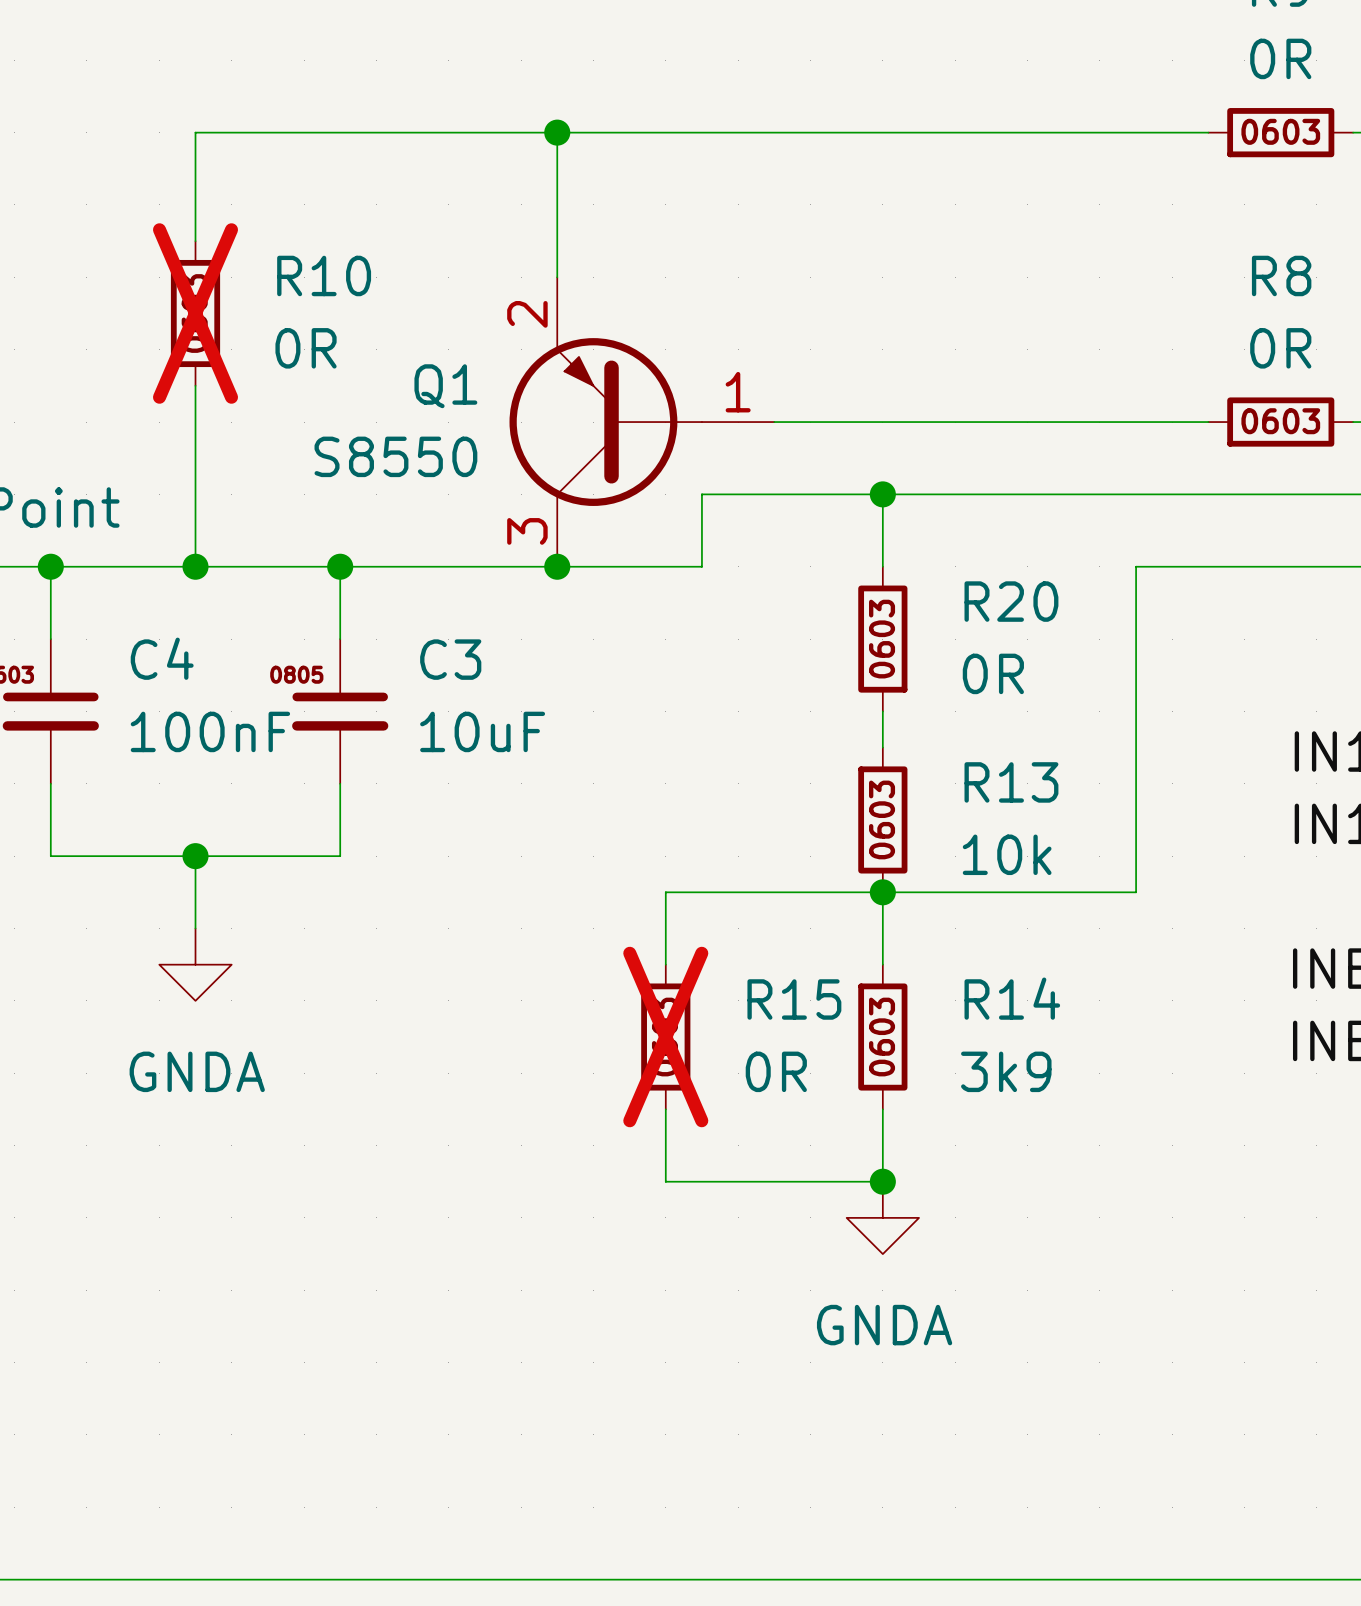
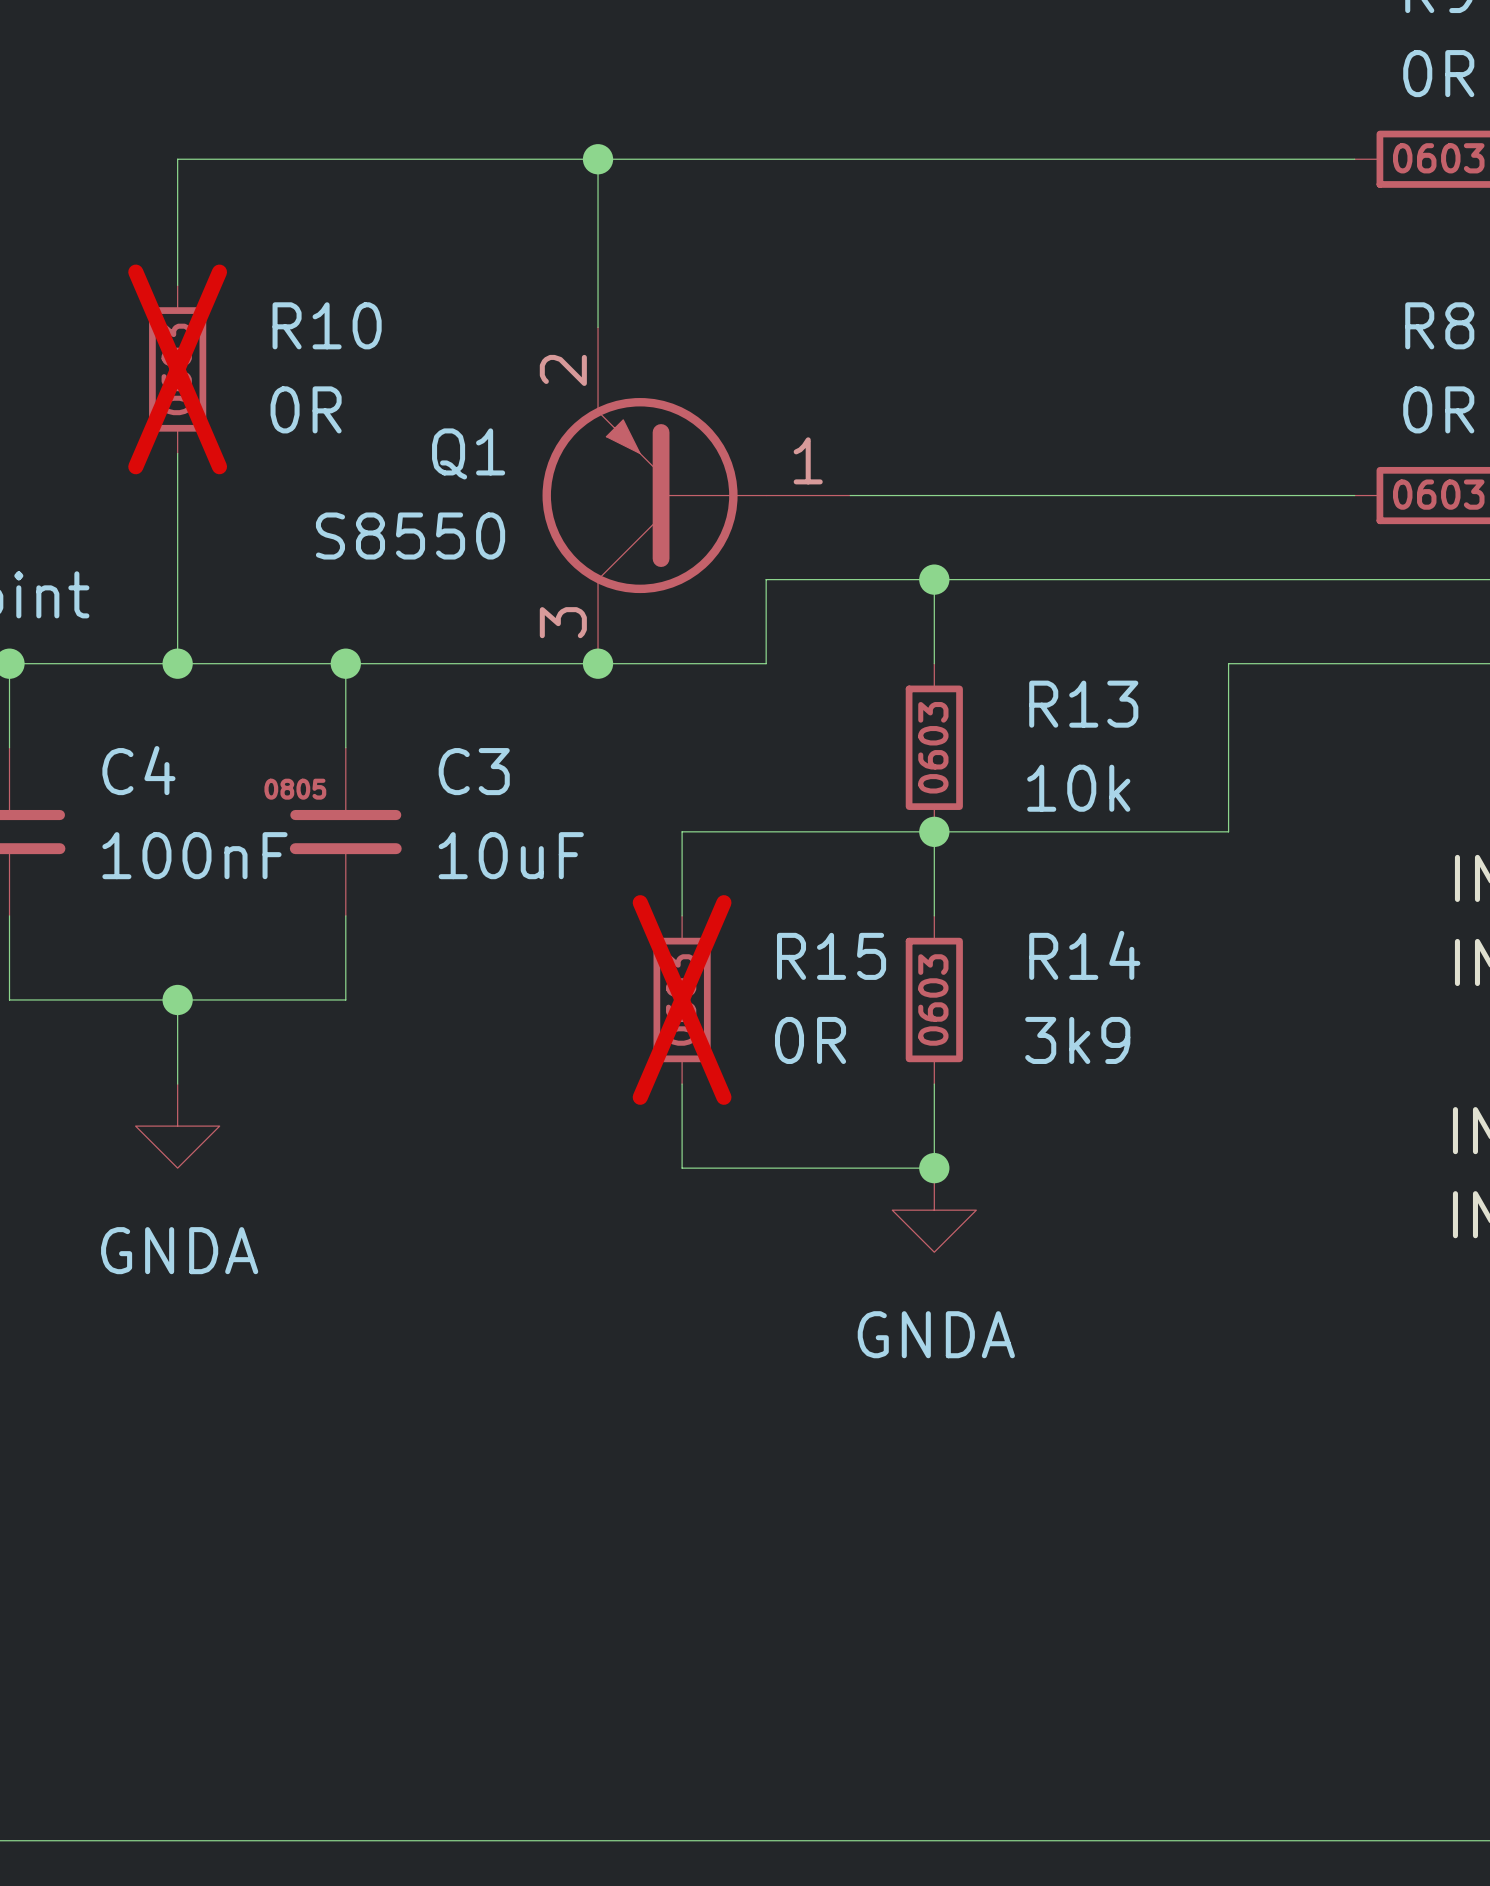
wire: (882, 494) (882, 566) -> (934, 579) (934, 663)
junction position: (882, 494) -> (934, 579)
wire: (1136, 566) (1136, 892) (665, 892) (665, 964) -> (1270, 663) (1228, 663) (1228, 831) (682, 831) (682, 915)
R20: 0R (882, 639) -> none
junction: none -> (934, 831)
wire: (882, 711) (882, 747) -> none
R13 position: (882, 819) -> (934, 747)
wire: (882, 892) (882, 964) -> (934, 831) (934, 915)
junction: (882, 892) -> none
junction: none -> (934, 1168)
R15 position: (665, 1037) -> (682, 999)
R14 position: (882, 1037) -> (934, 999)
wire: (665, 1109) (665, 1181) (882, 1181) (882, 1109) -> (682, 1084) (682, 1168) (934, 1168) (934, 1084)
junction: (882, 1181) -> none
power symbol position: GNDA (882, 1217) -> GNDA (934, 1210)

